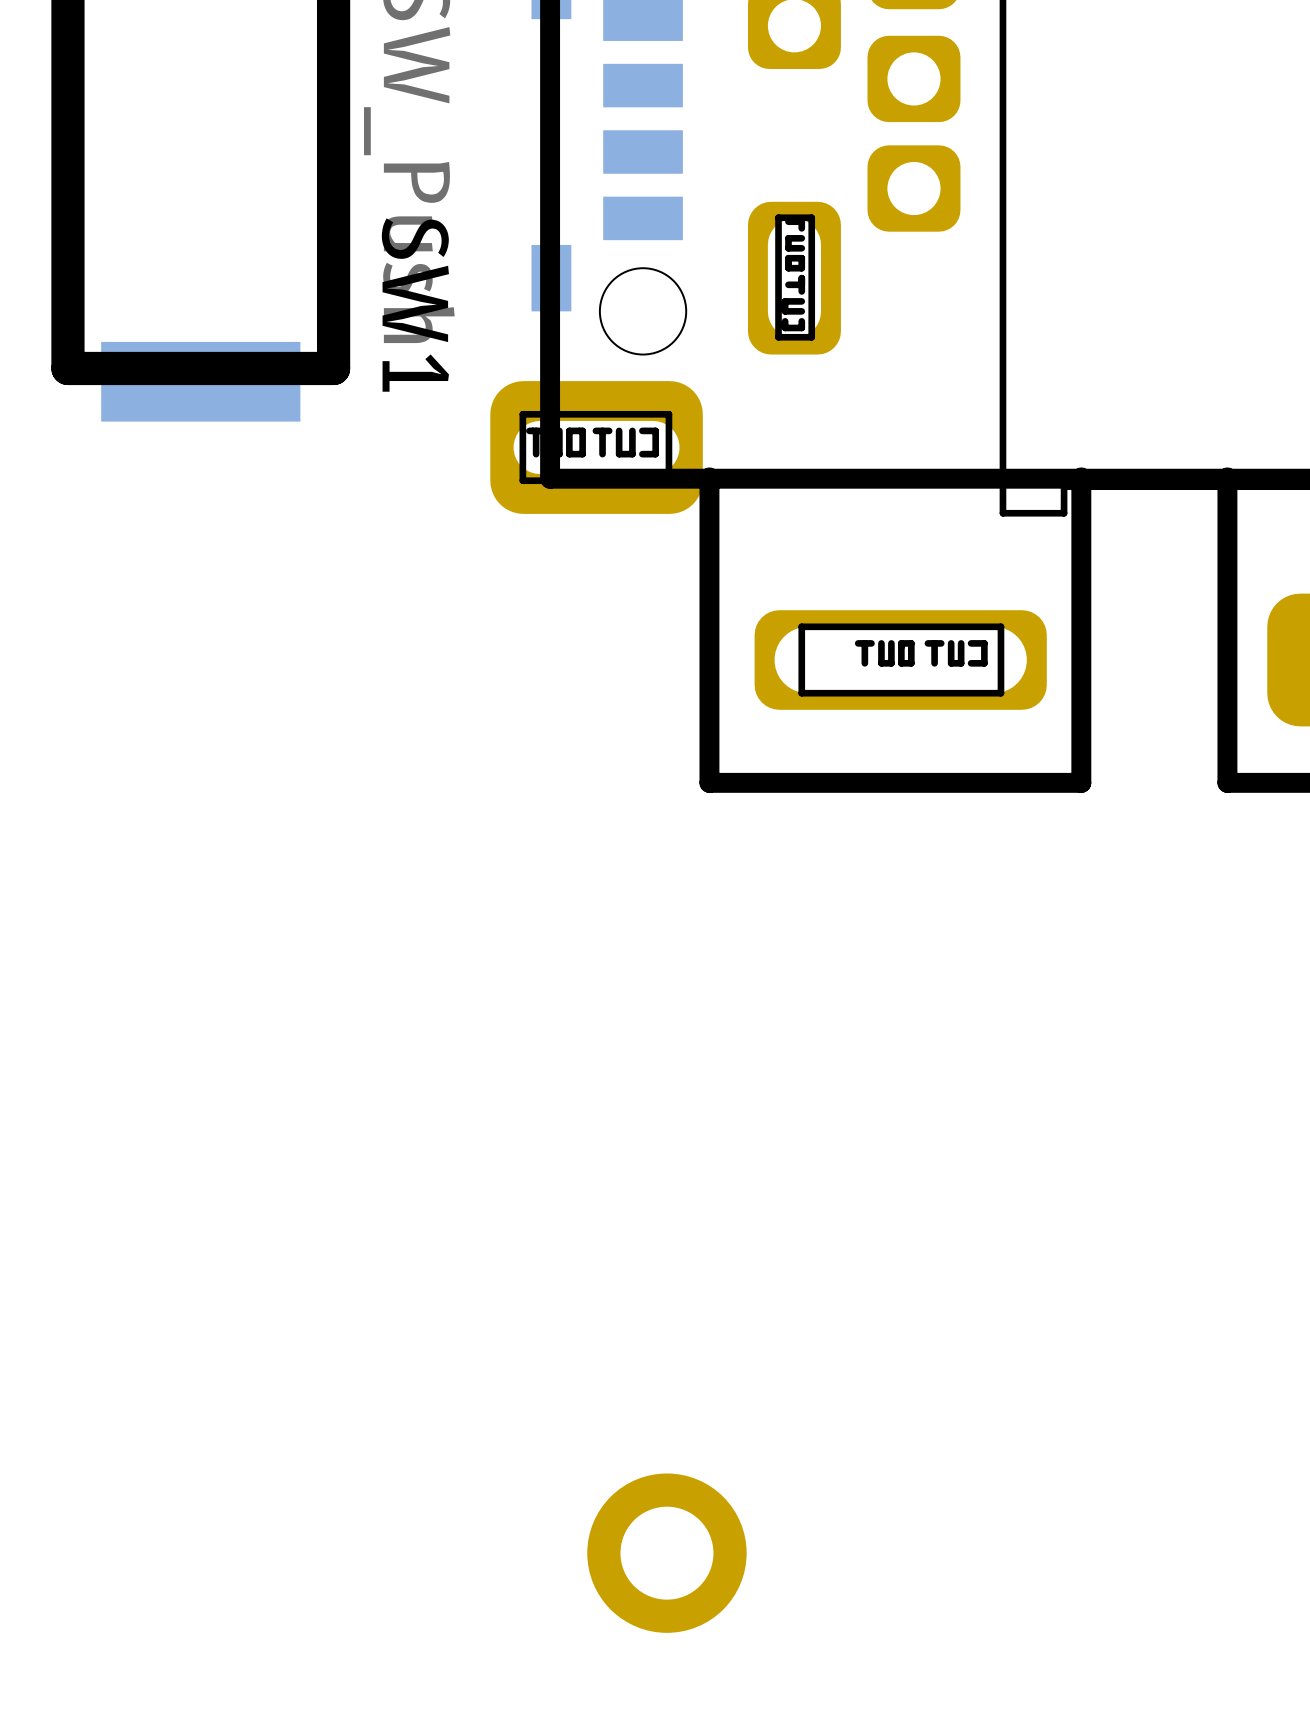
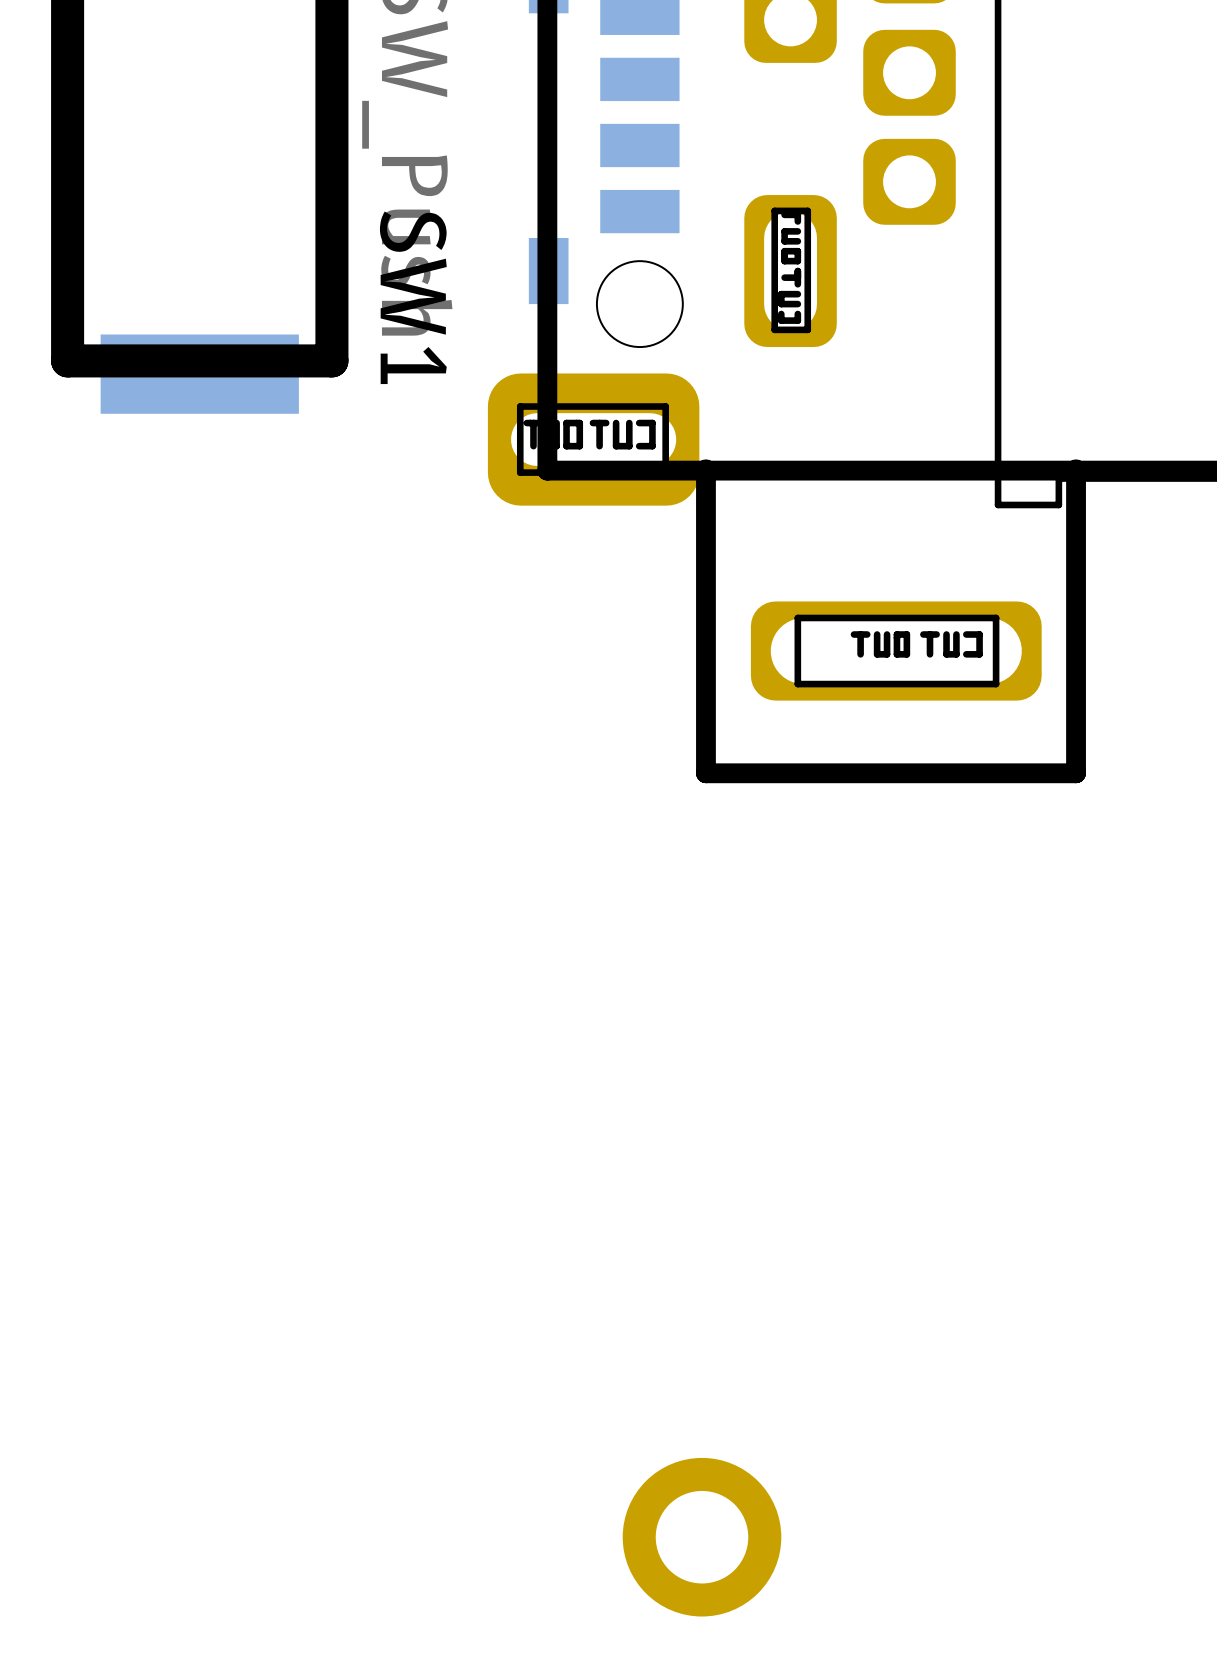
part position: (666, 1553) -> (702, 1537)

